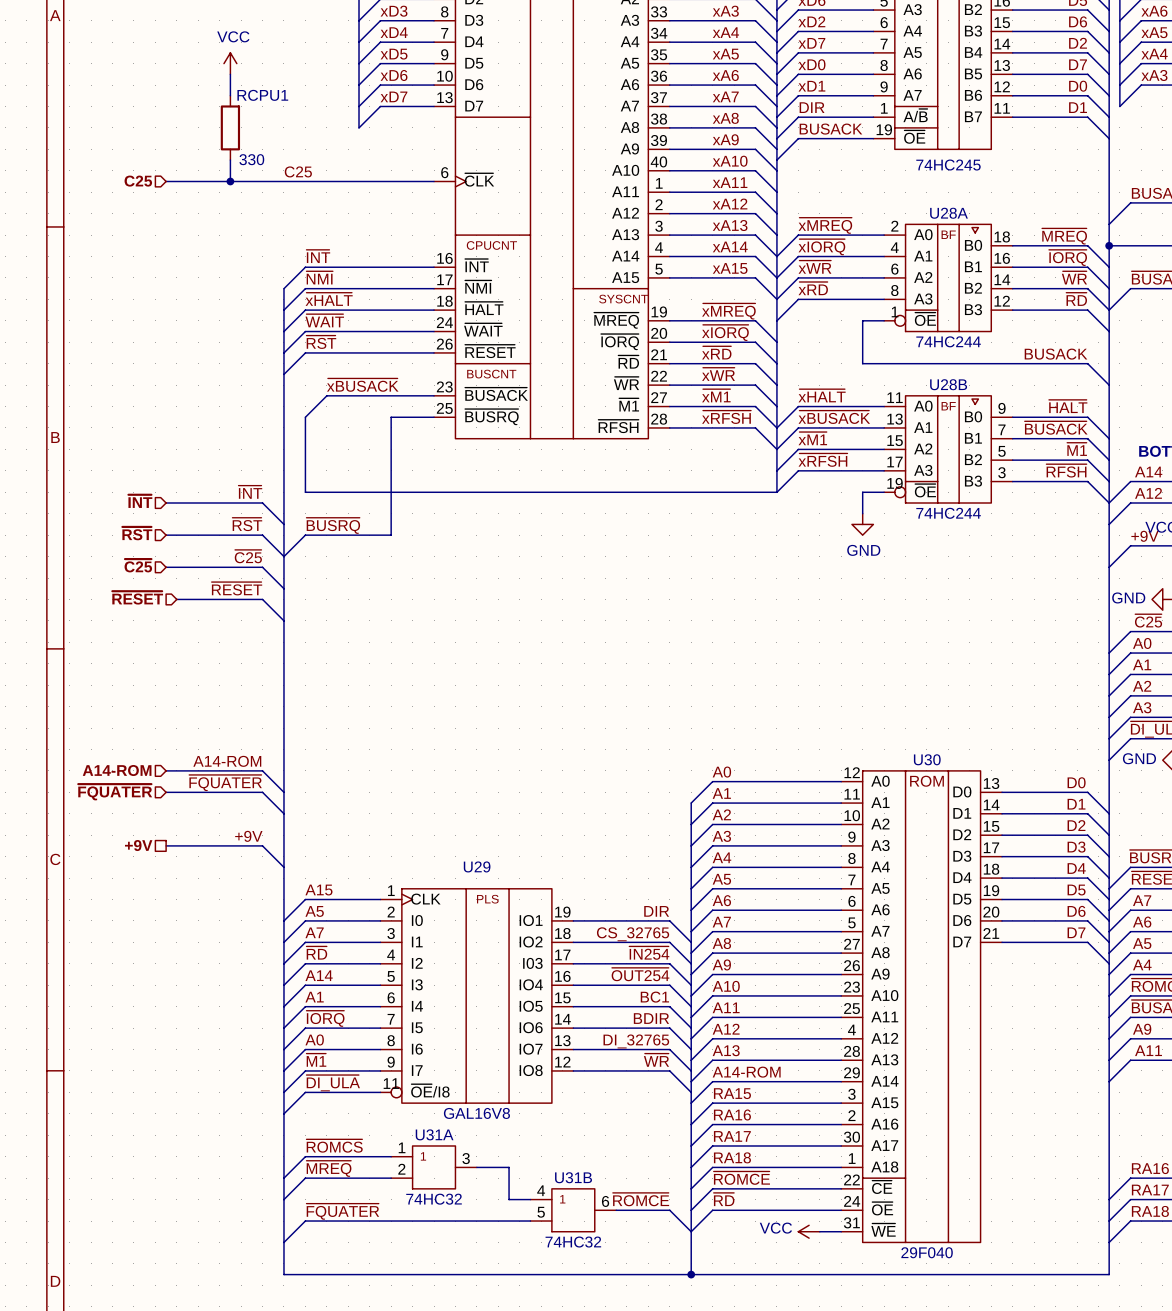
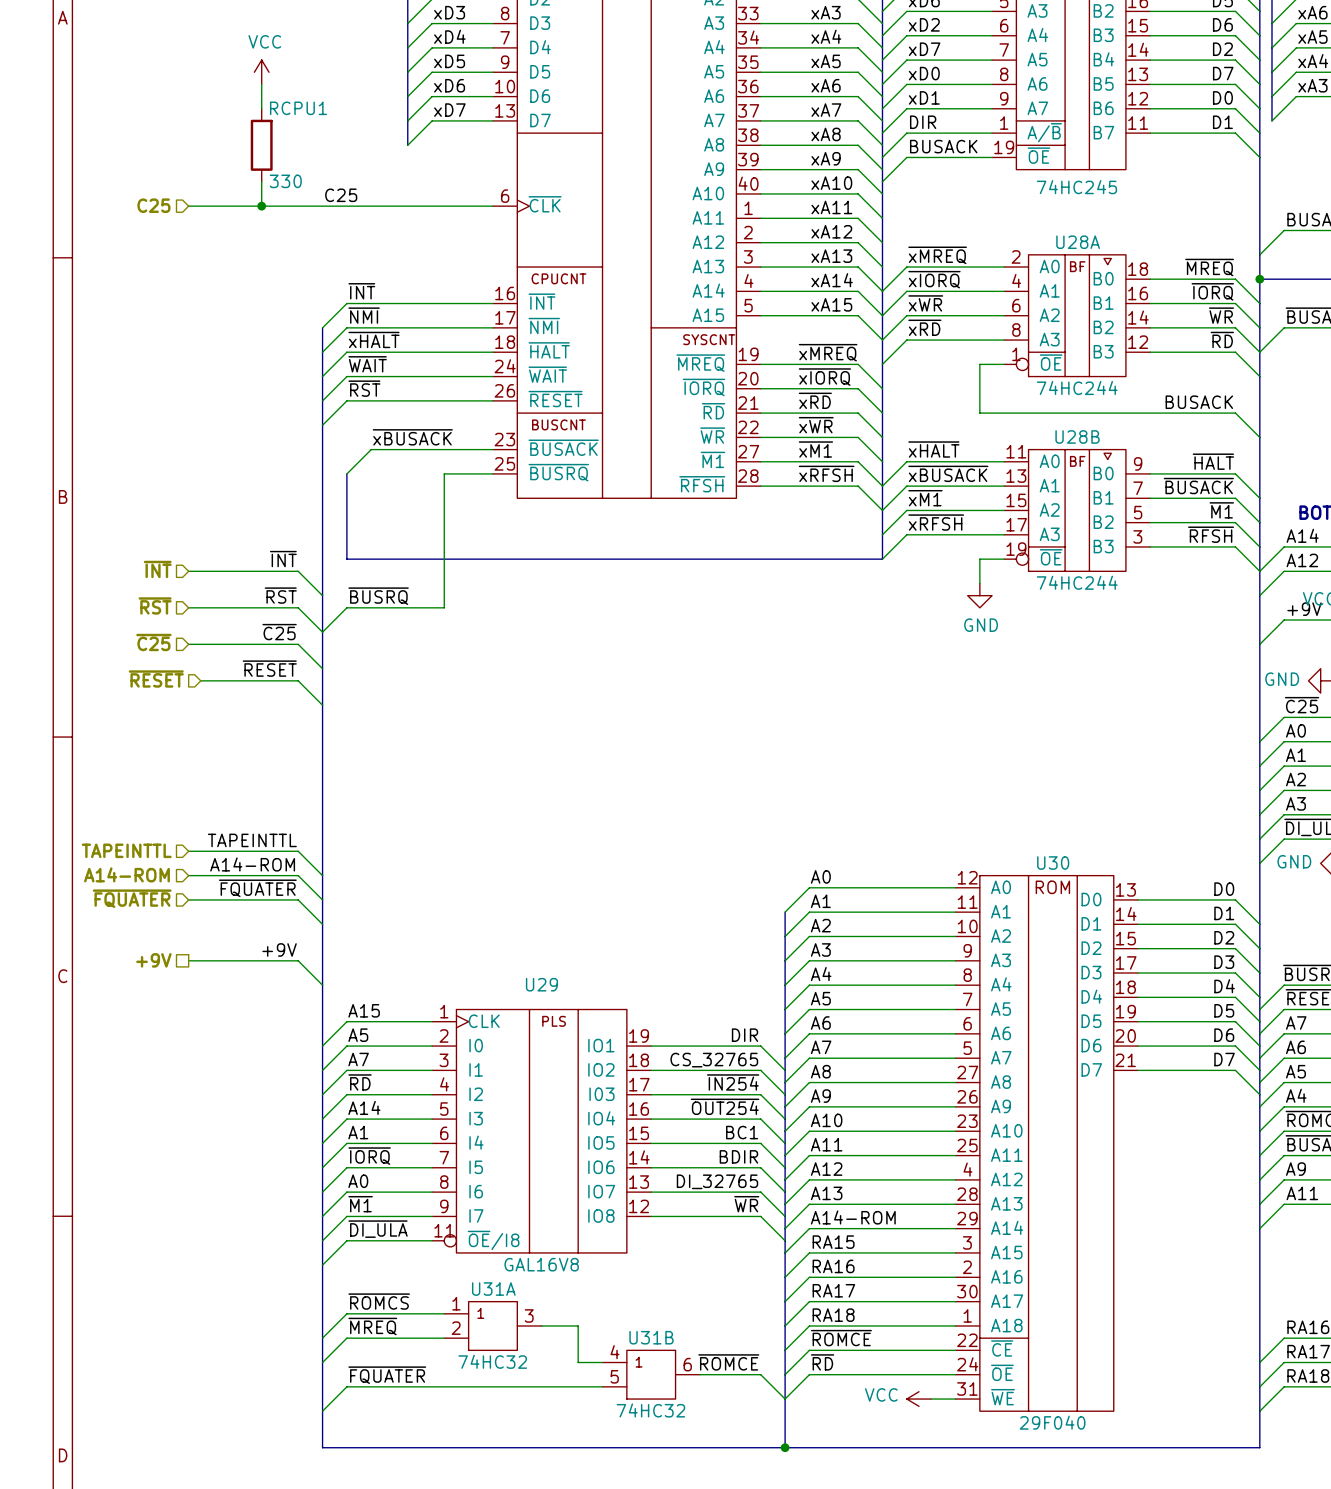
label: none -> TAPEINTTL (252, 840)
hierarchical label: none -> TAPEINTTL (126, 850)
wire: none -> (188, 851) (298, 851) (322, 875)

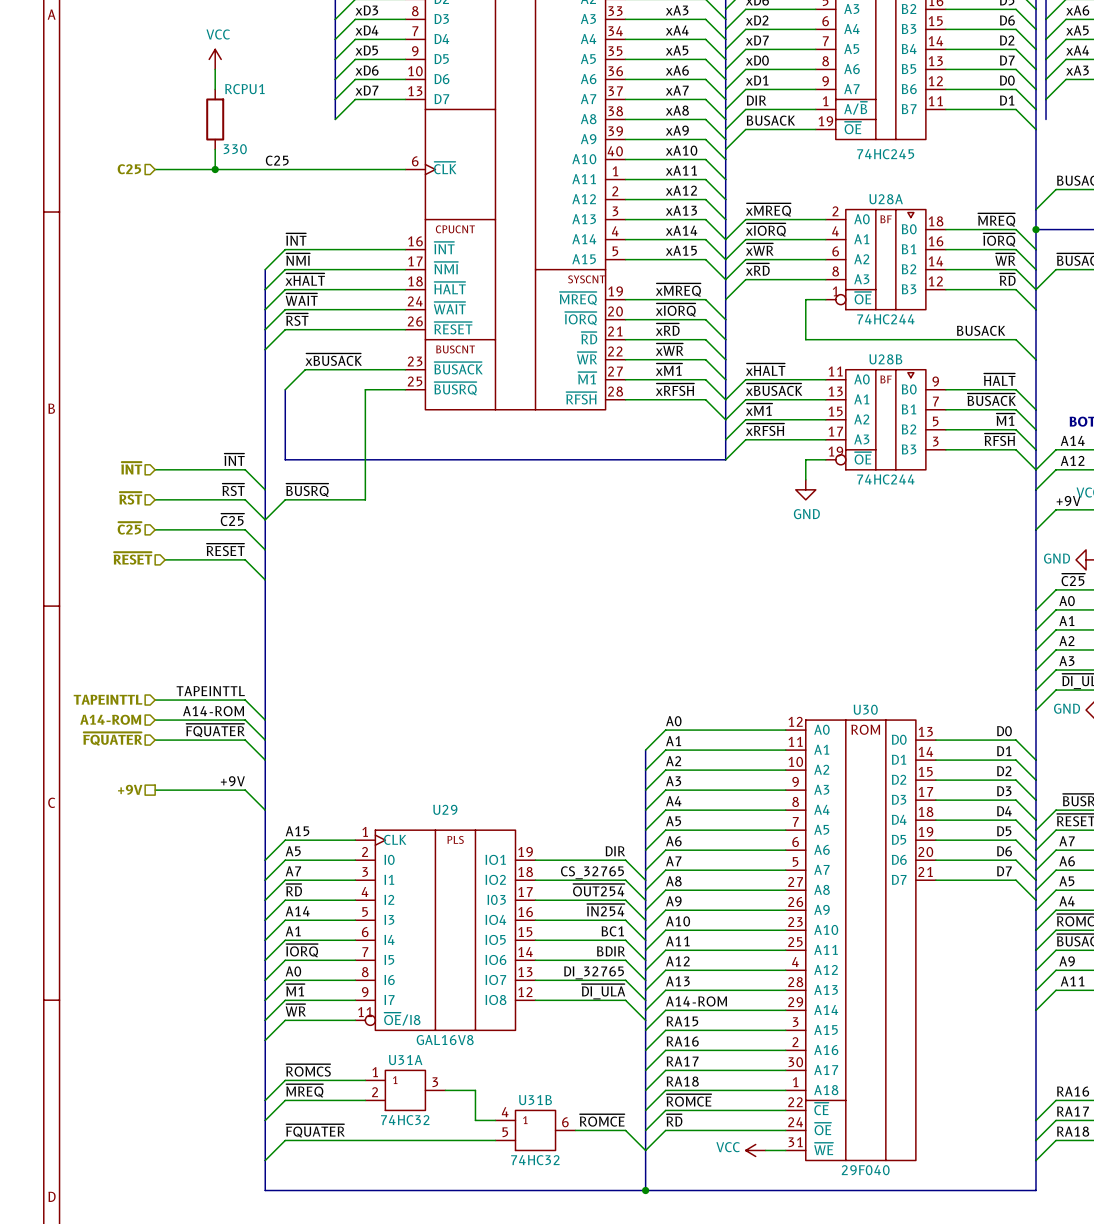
bus: none -> (1046, 99) (1046, 119)
label: ~{IN254} (733, 1082) -> ~{OUT254} (598, 890)
label: ~{OUT254} (725, 1106) -> ~{IN254} (605, 910)
label: ~{WR} (746, 1204) -> ~{DI_ULA} (603, 991)
label: ~{DI_ULA} (378, 1229) -> ~{WR} (295, 1010)

